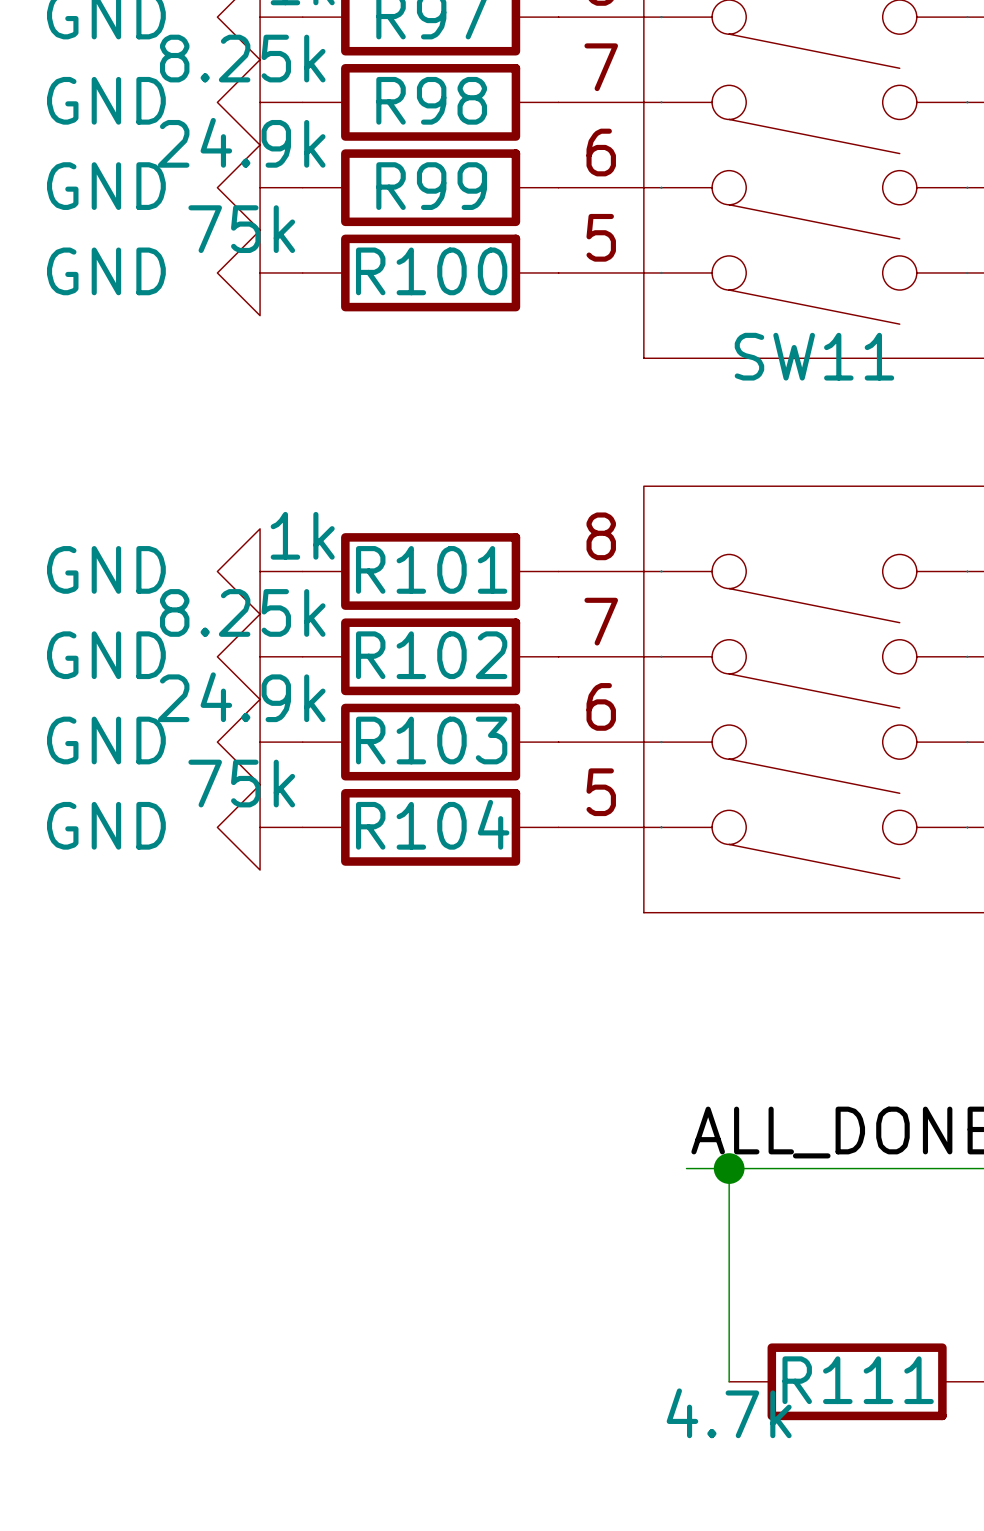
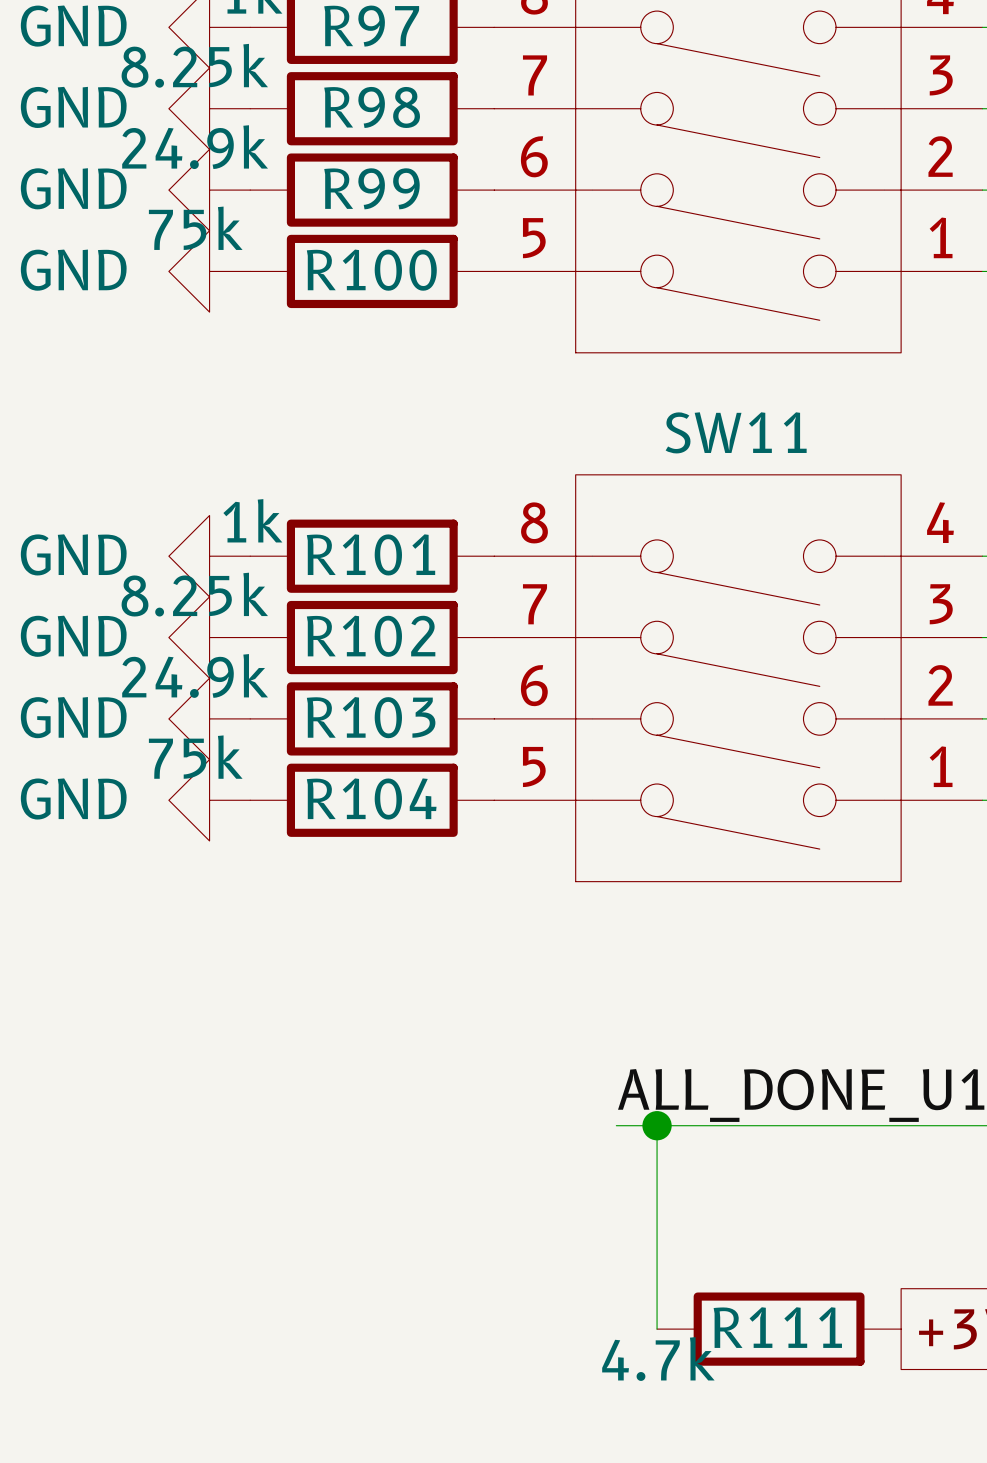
SW11 name position: SW11 (814, 356) -> SW11 (736, 432)

